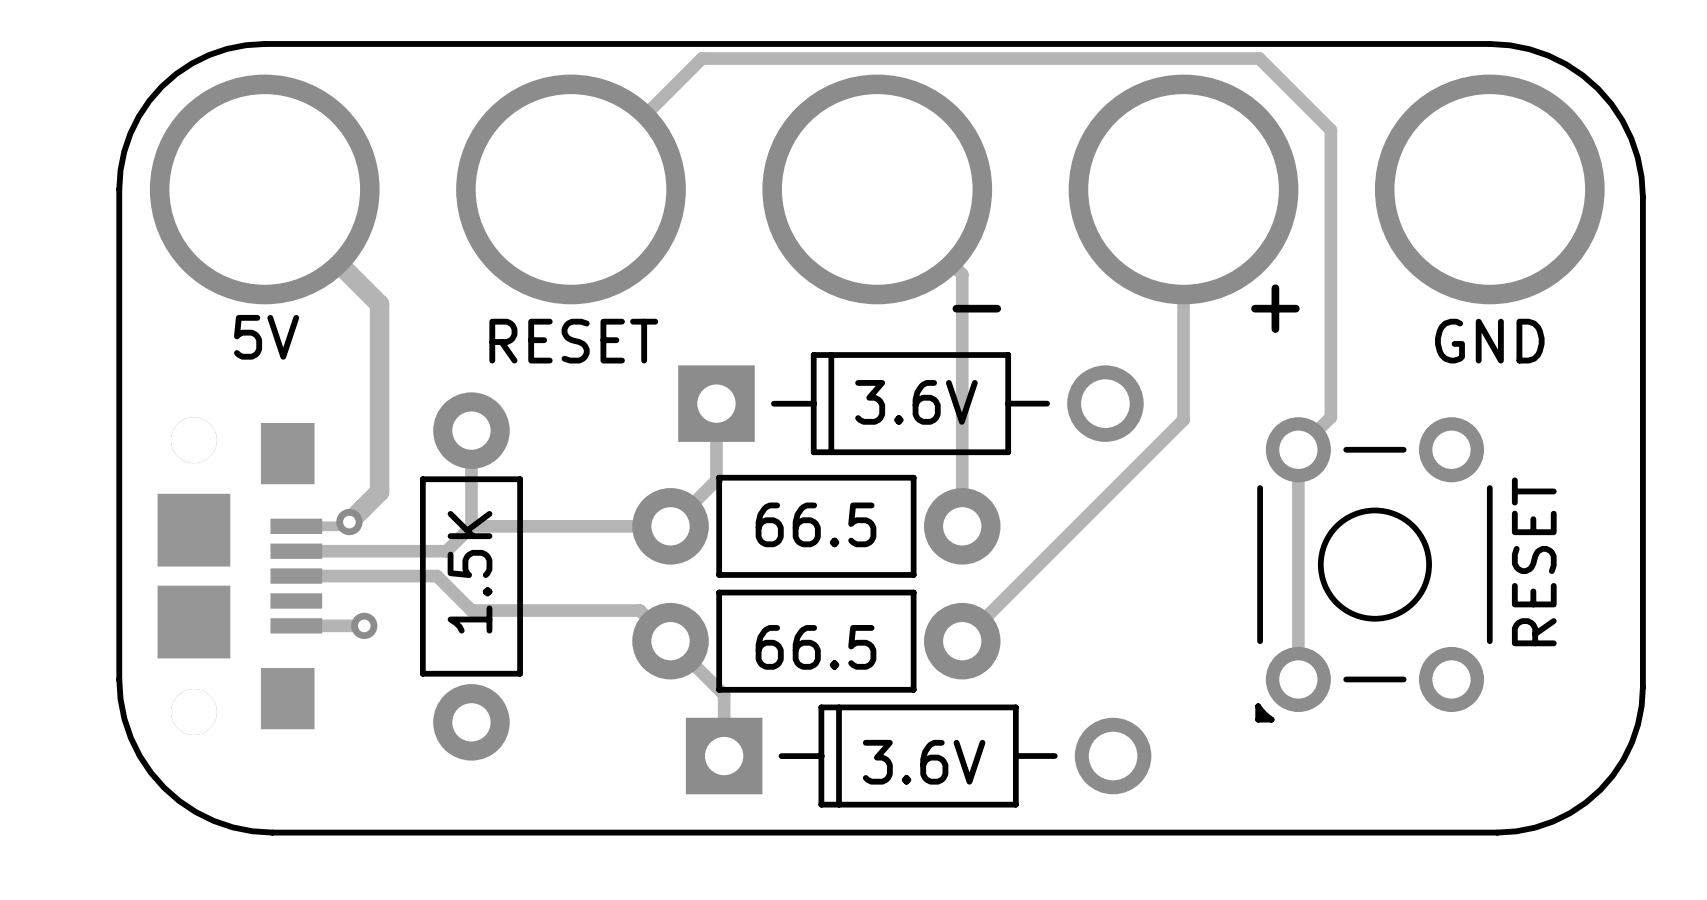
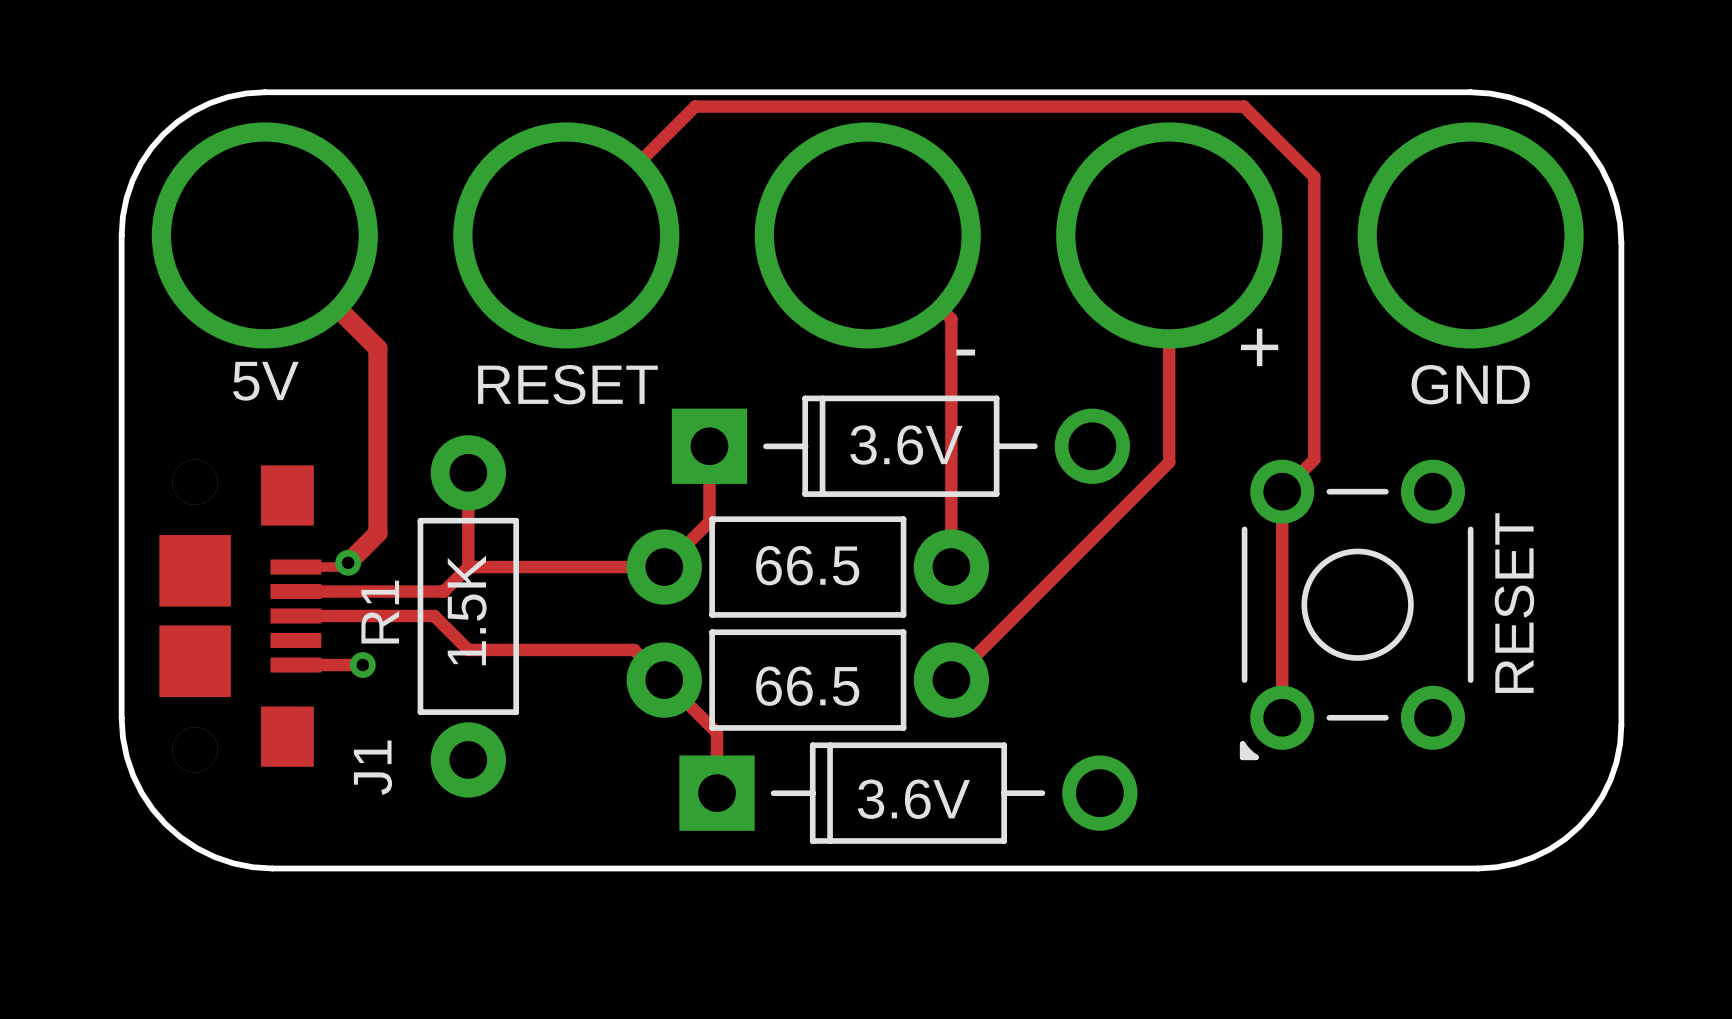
R1 name: none -> R1 (380, 612)
J1 name: none -> J1 (372, 767)

